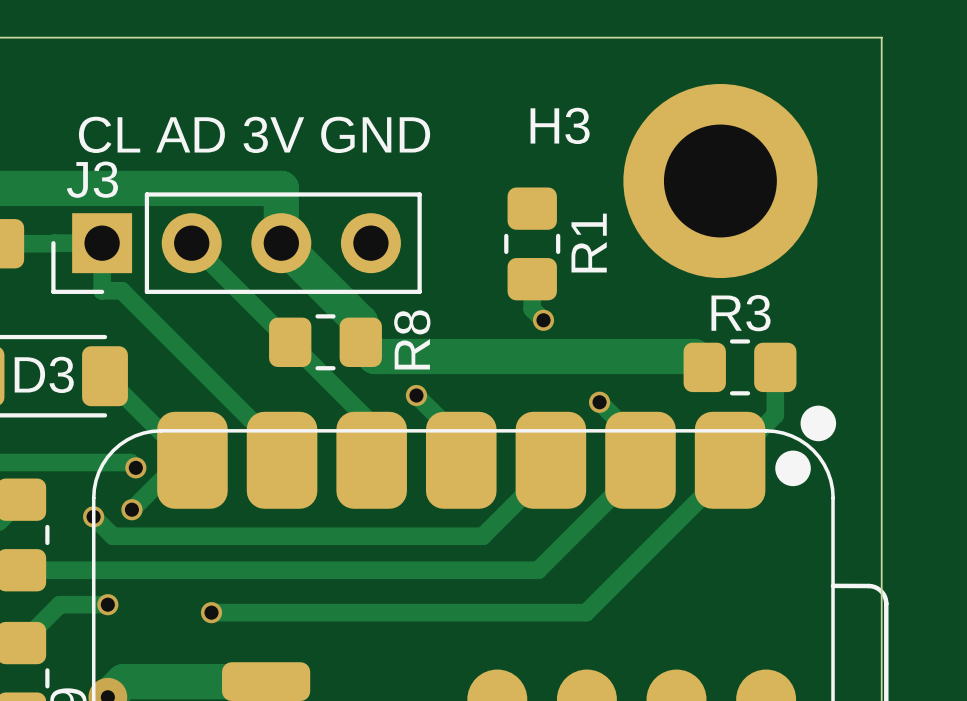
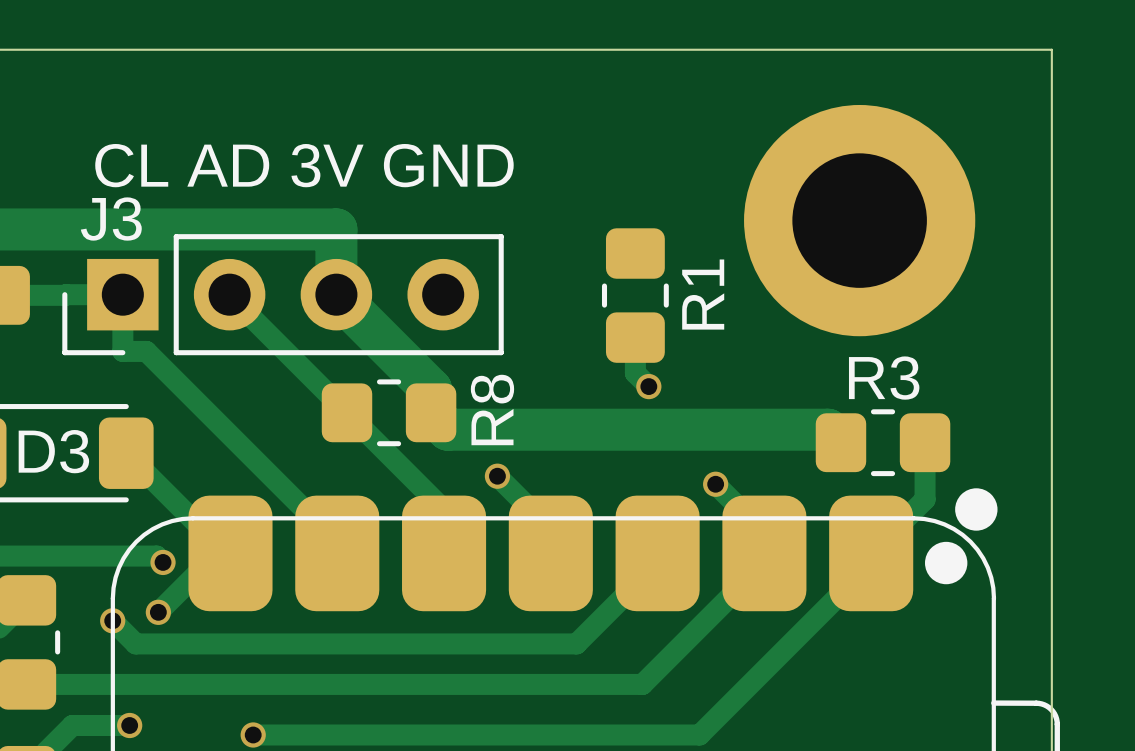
H3 name: H3 (560, 125) -> none

